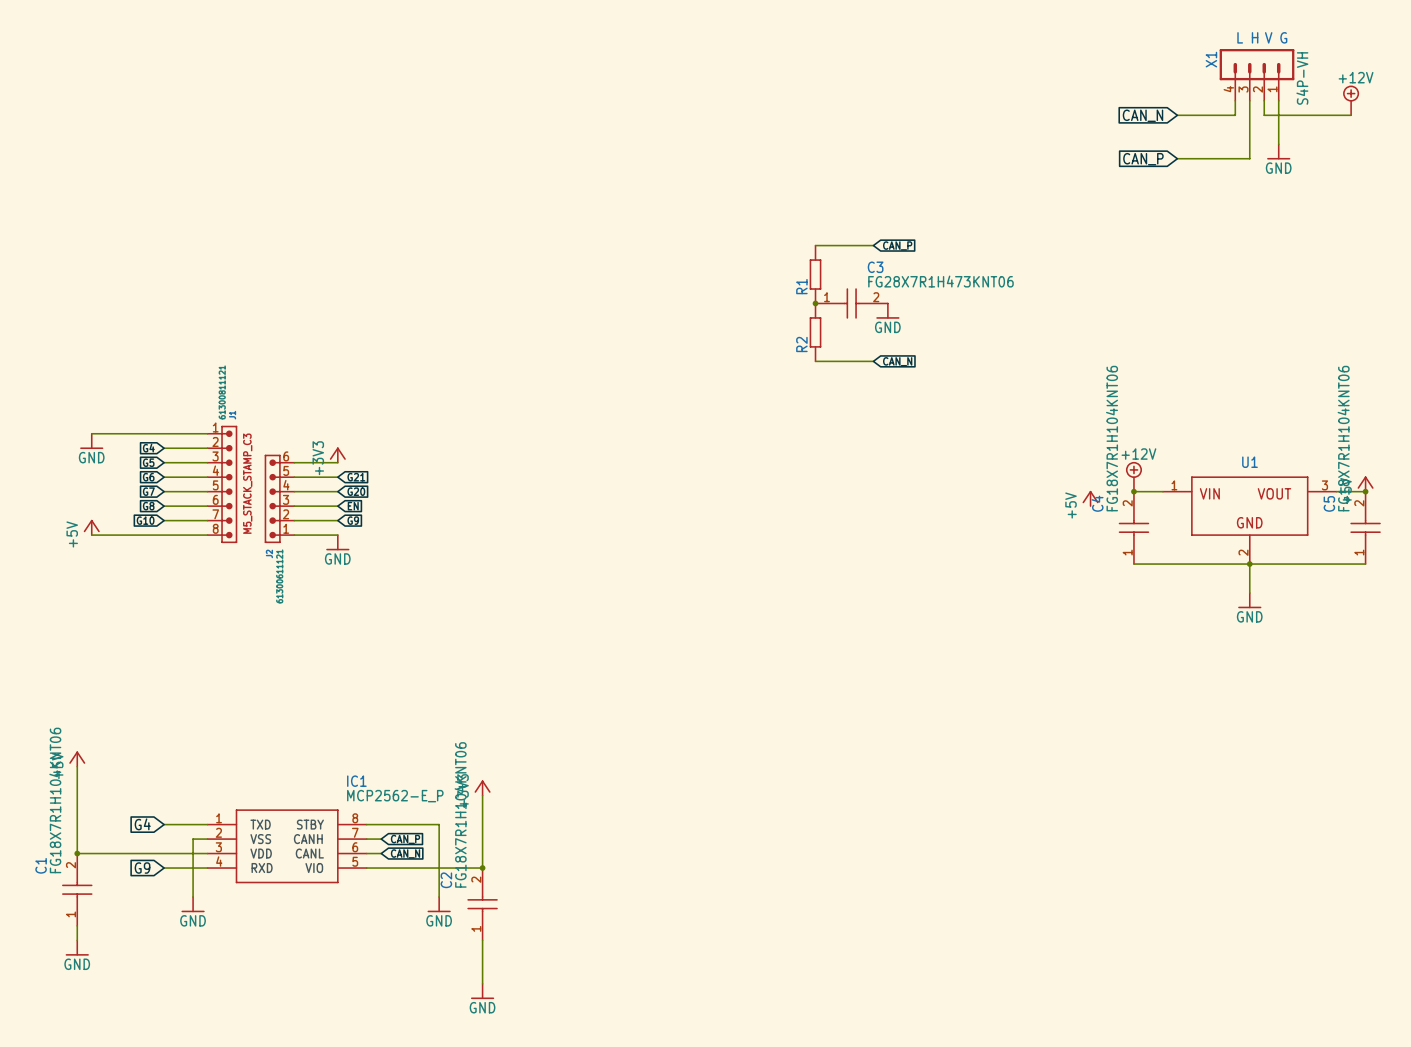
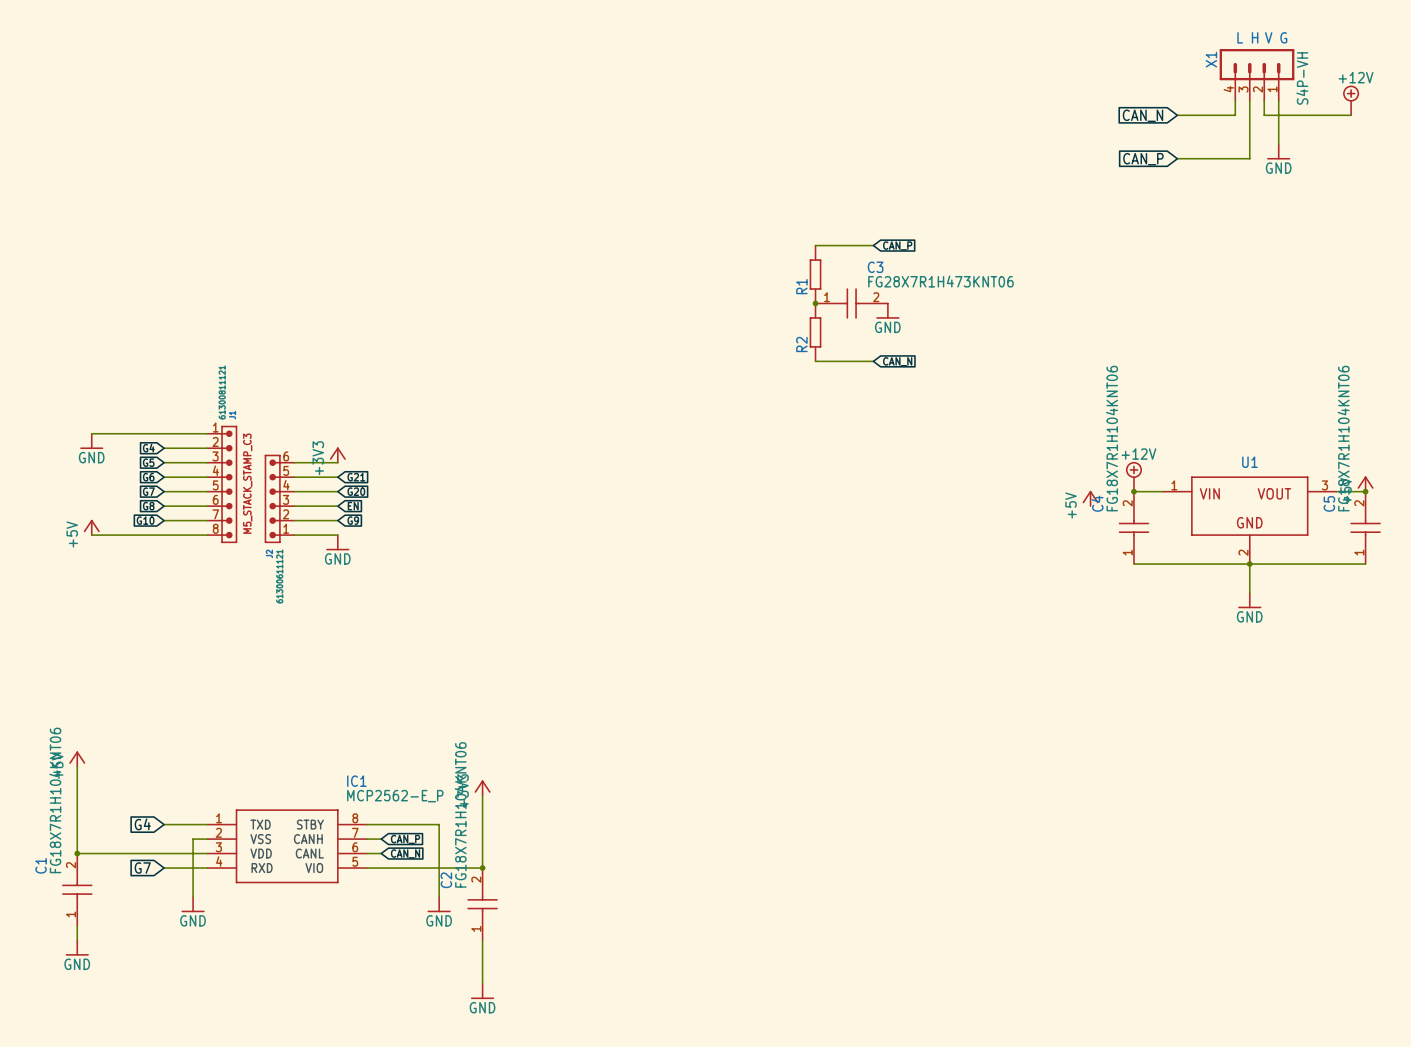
global label: G9 (142, 868) -> G7 (142, 868)

